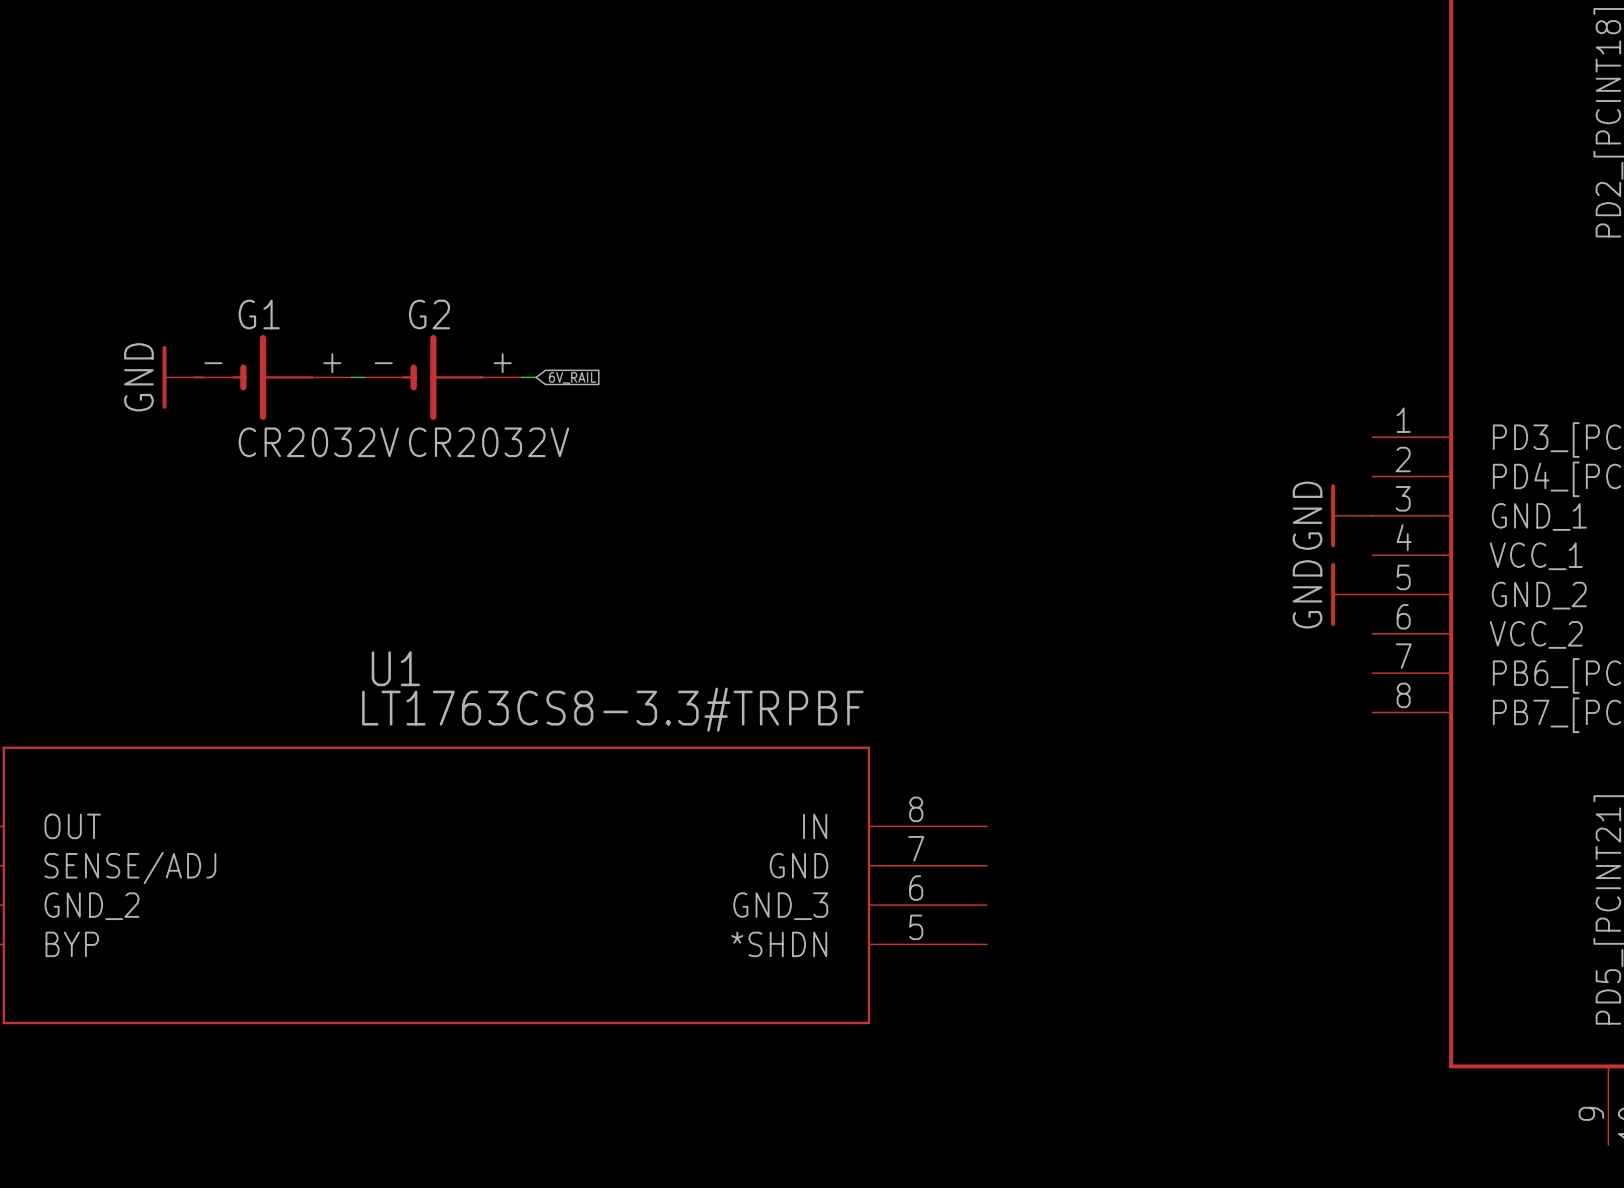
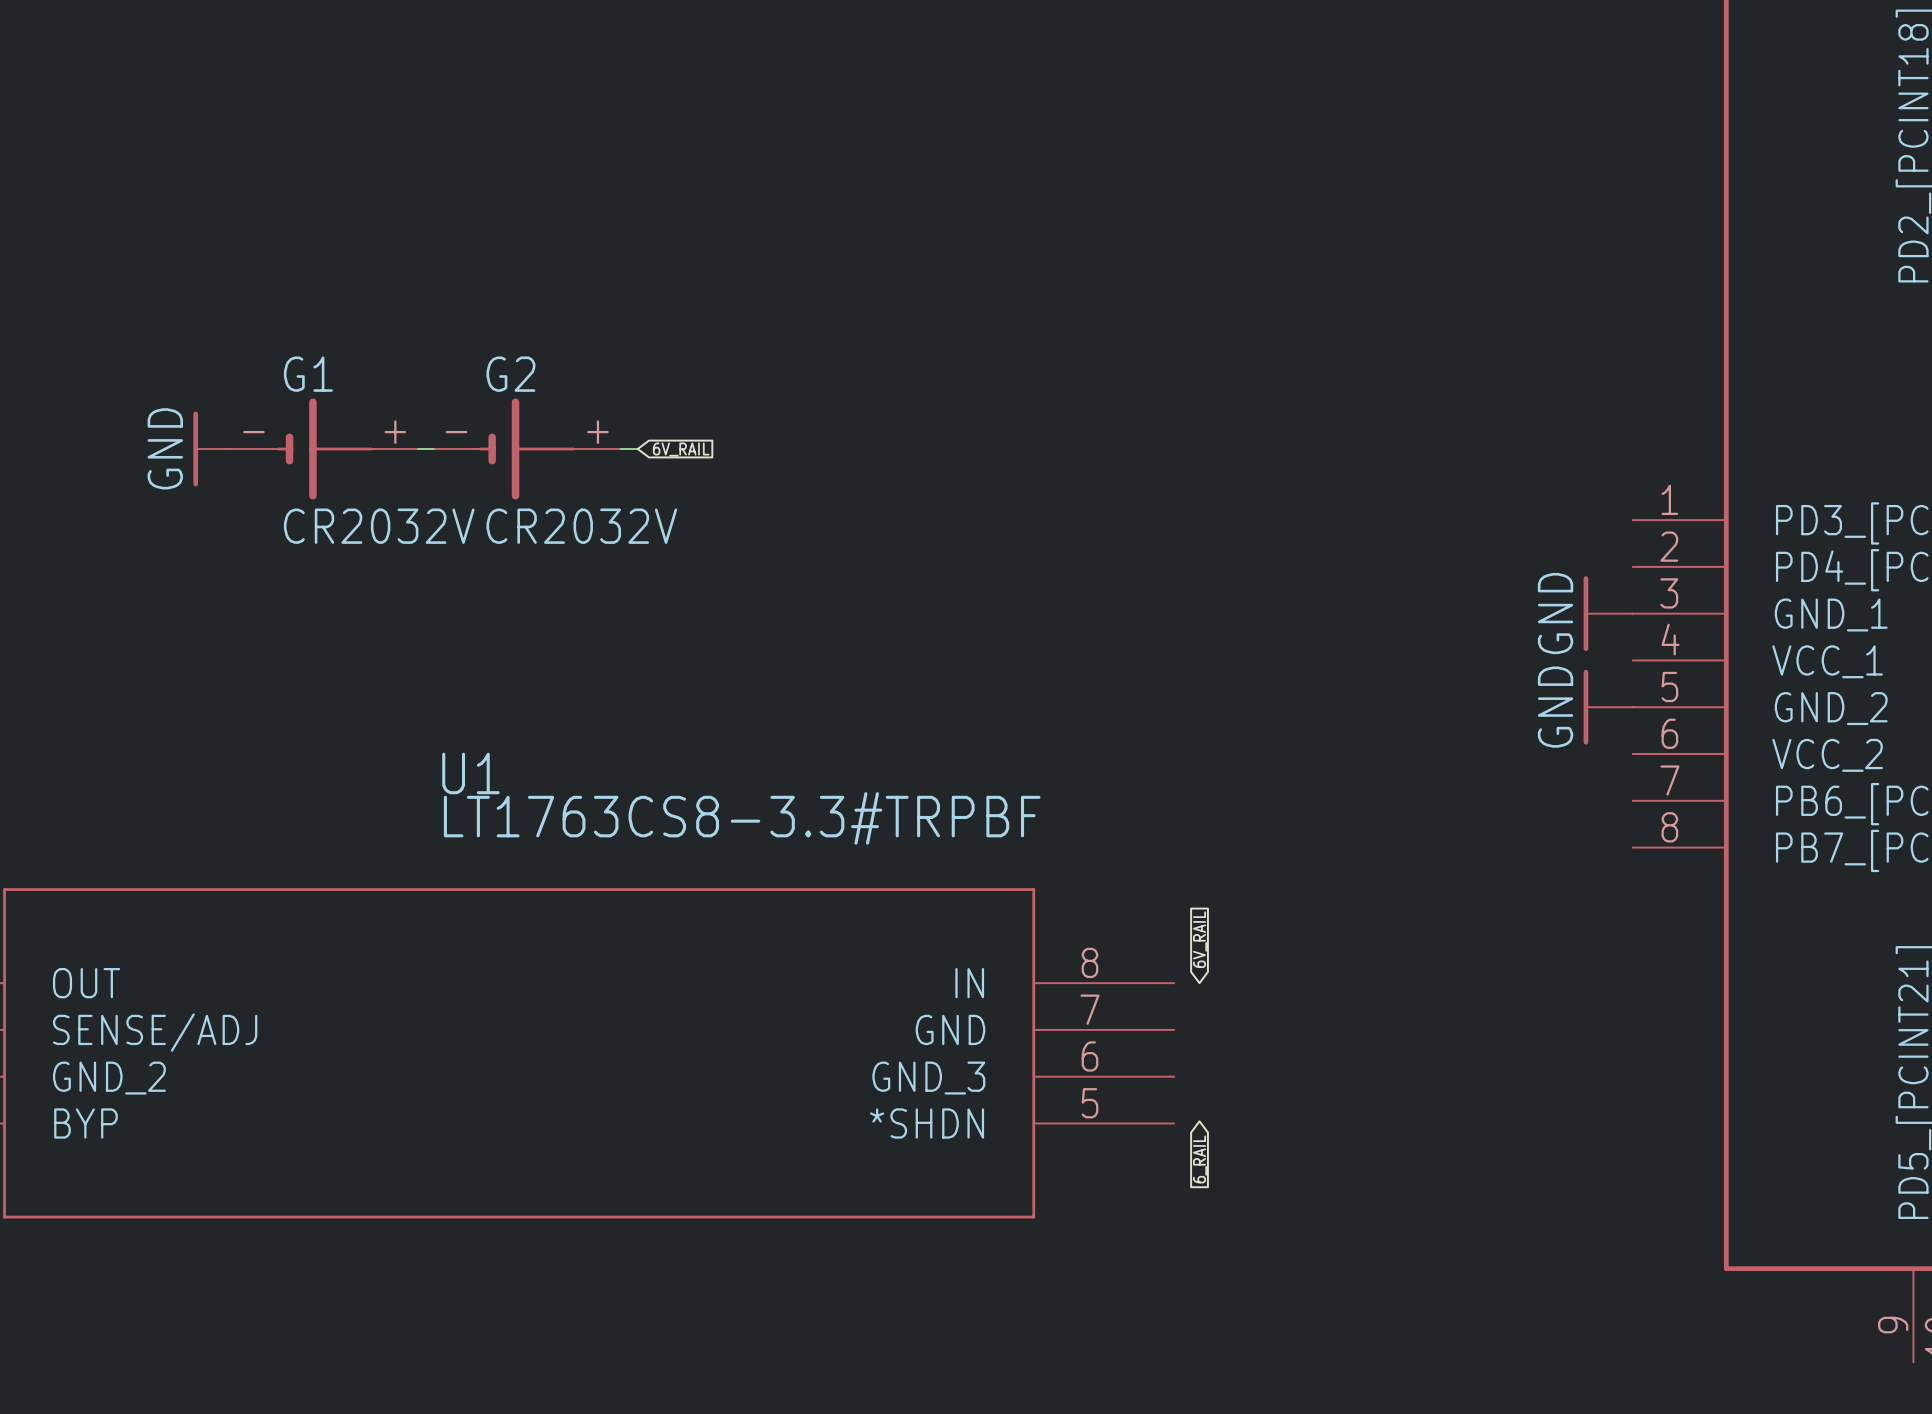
U1 name position: U1 (395, 668) -> U1 (470, 773)
U1 value position: LT1763CS8-3.3#TRPBF (612, 709) -> LT1763CS8-3.3#TRPBF (742, 818)
global label: none -> 6V_RAIL (1200, 939)
global label: none -> 6_RAIL (1200, 1159)

